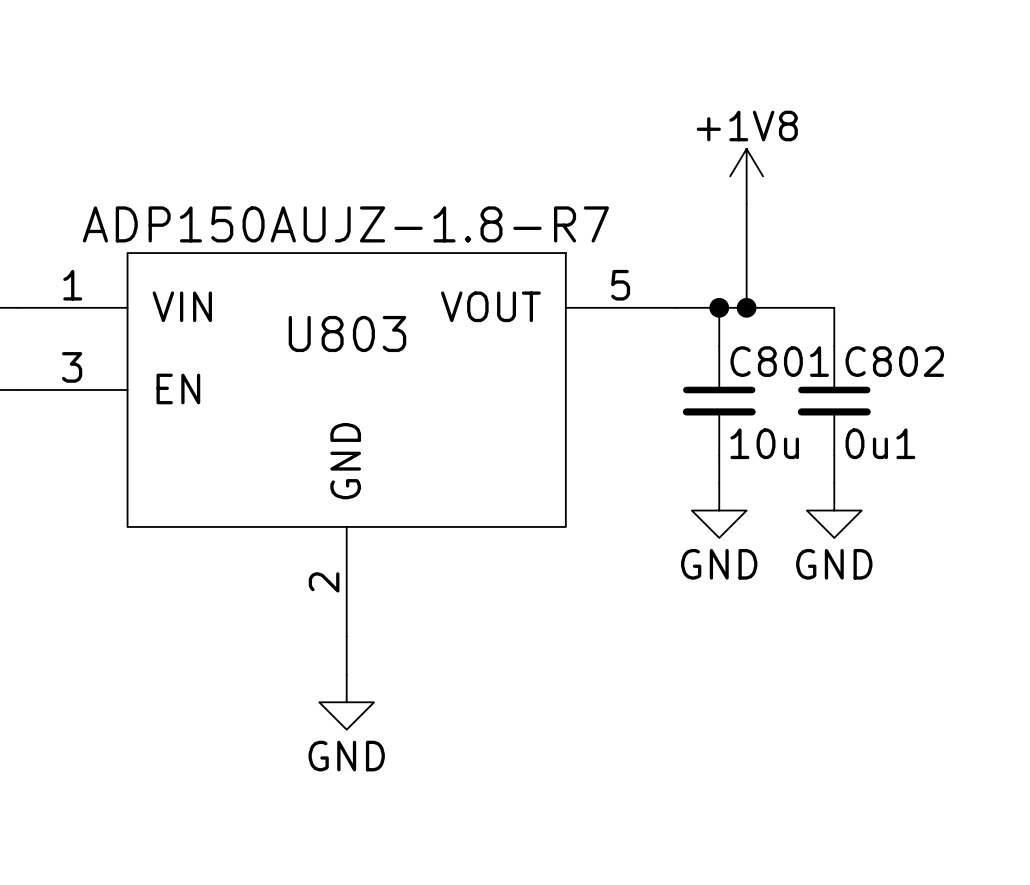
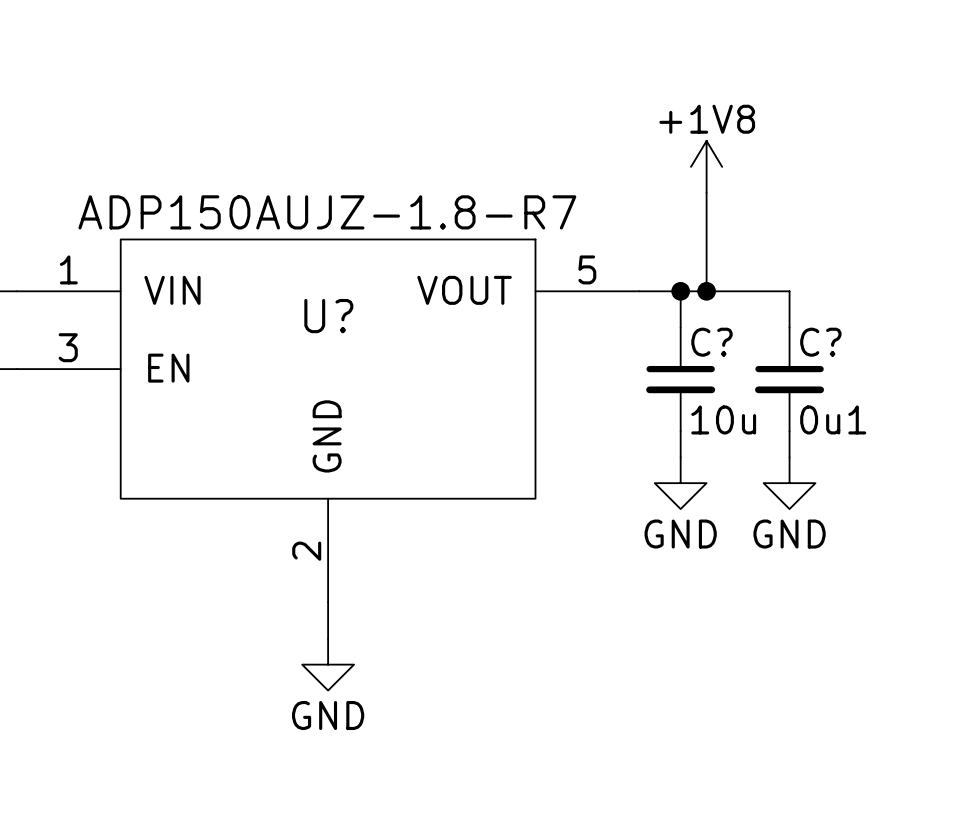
U803 name: U803 (347, 333) -> U? (328, 316)
C801 name: C801 (779, 361) -> C? (711, 342)
C802 name: C802 (894, 361) -> C? (820, 342)

